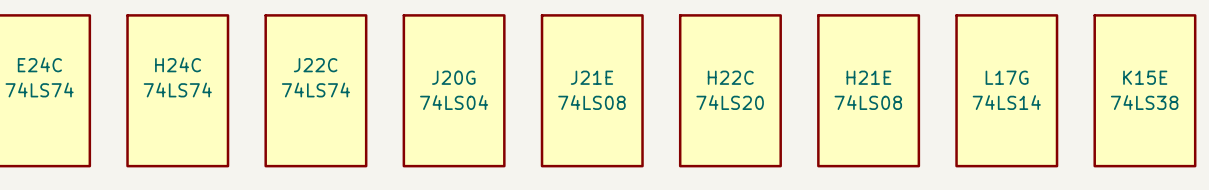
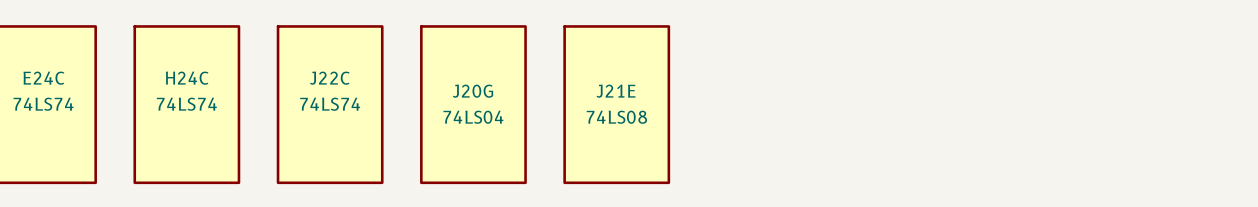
H22C: 74LS20 (730, 90) -> none
H21E: 74LS08 (868, 90) -> none
L17G: 74LS14 (1006, 90) -> none
K15E: 74LS38 (1144, 90) -> none

